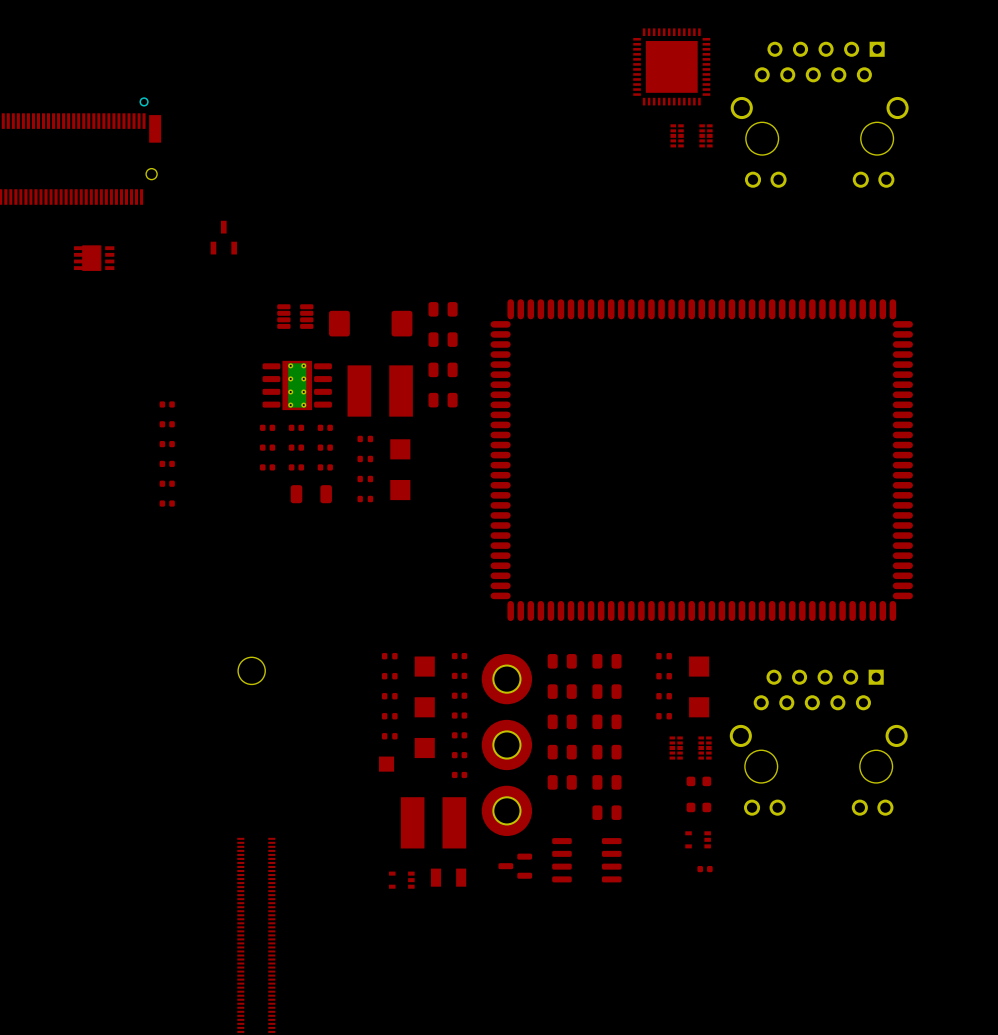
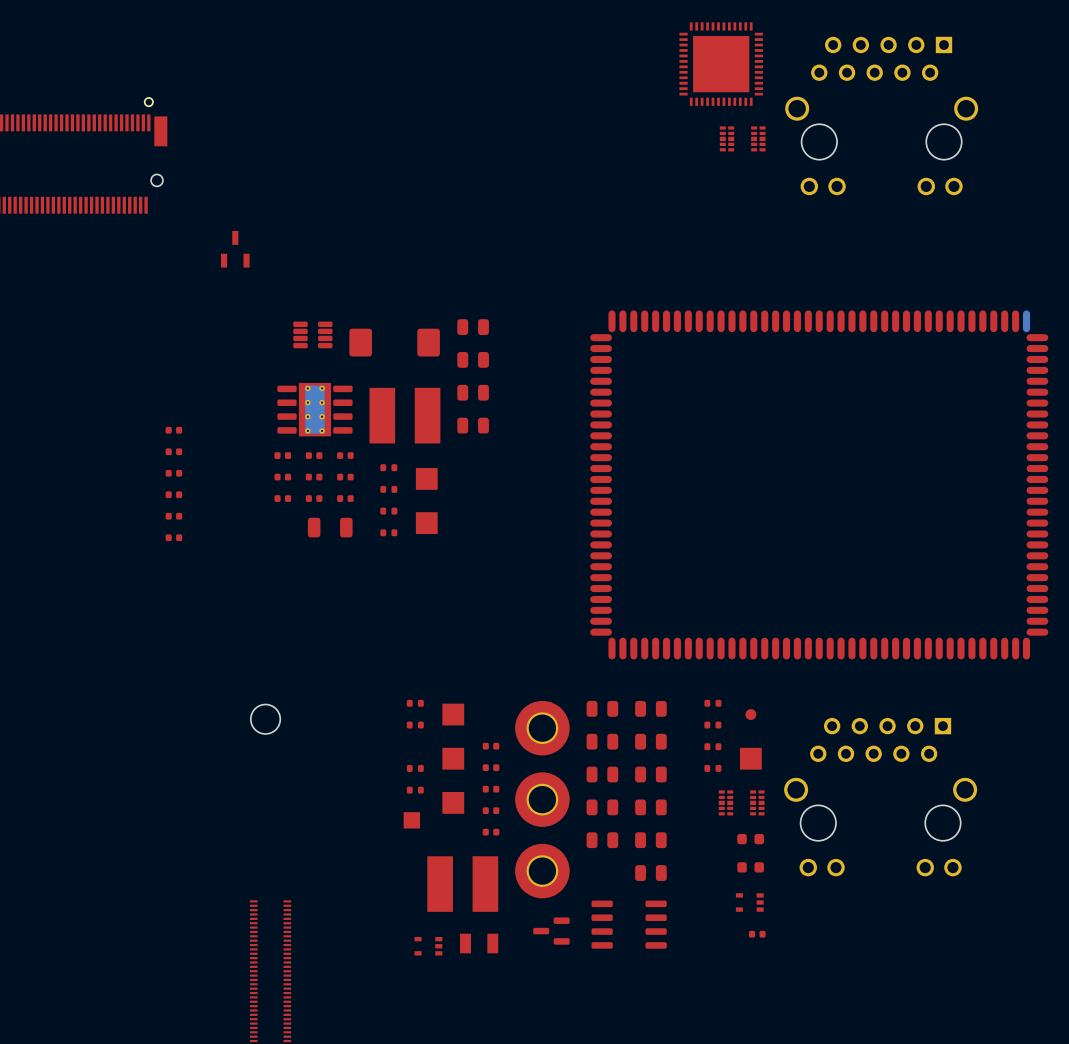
part: (94, 258) -> none
part: none -> (819, 484)
part: (701, 460) -> none
part: (459, 656) -> none
part footprint: [689, 656, 710, 677] -> [745, 709, 757, 720]
part: (459, 675) -> none
part: (389, 696) -> none

